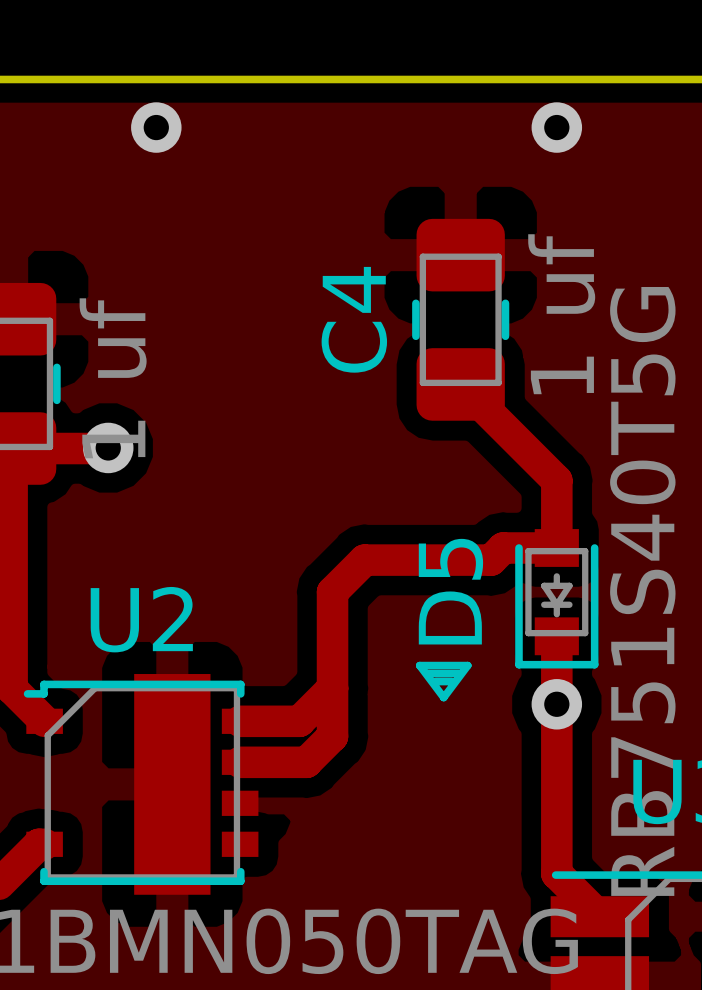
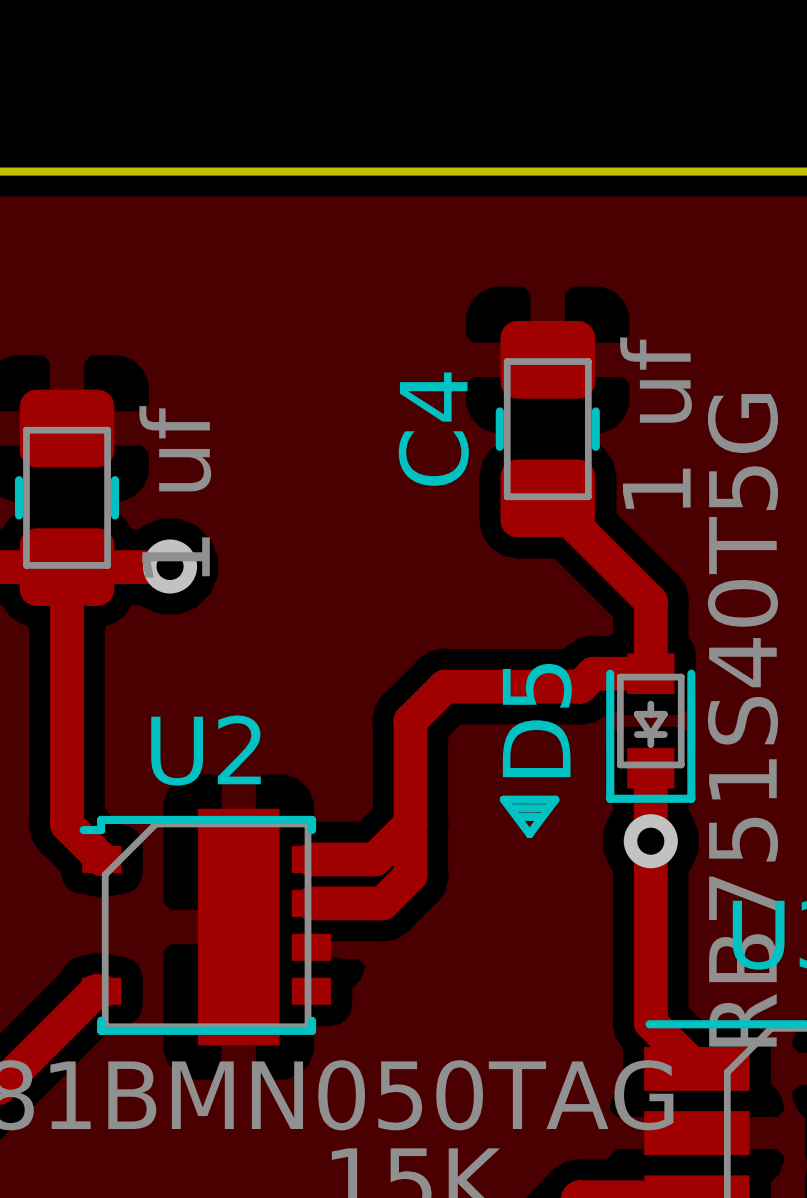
via: (156, 127) -> none
via: (556, 127) -> none

